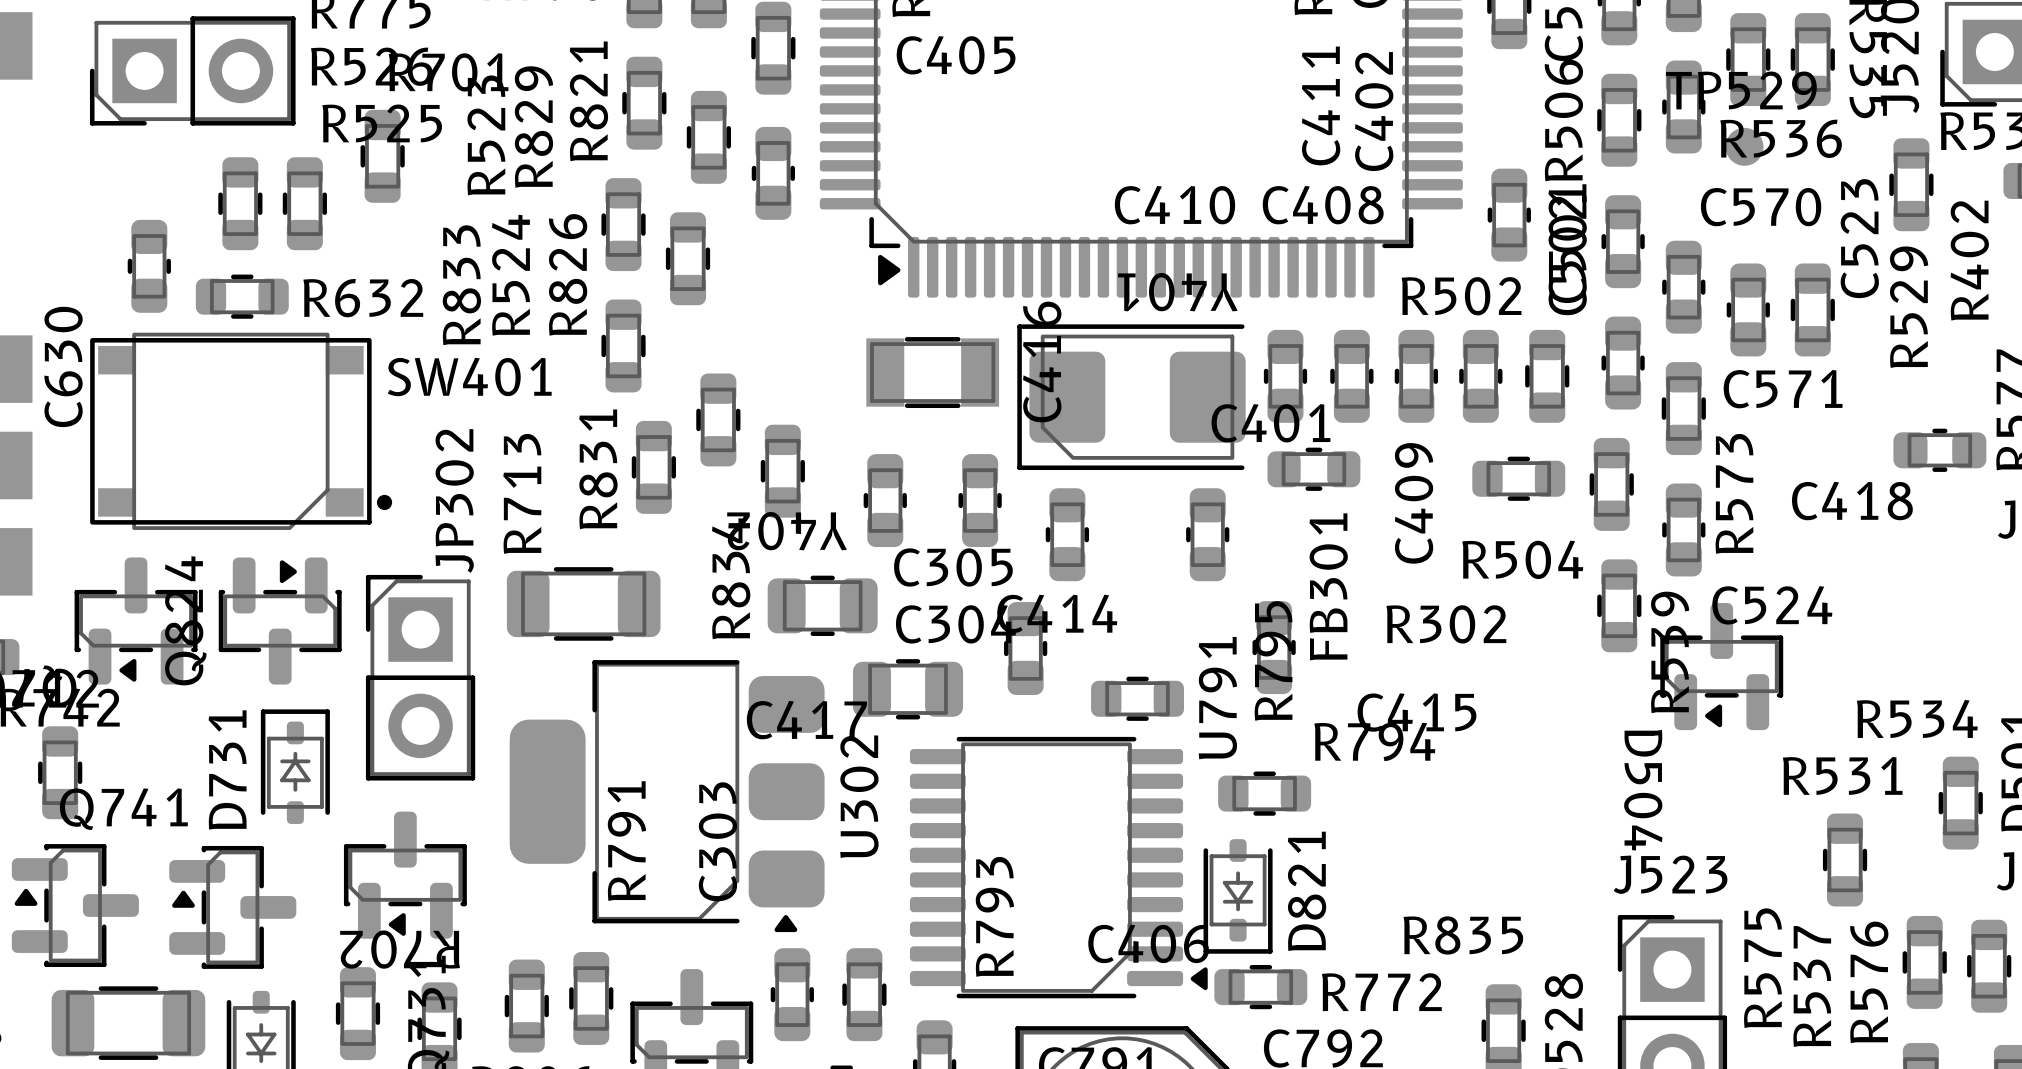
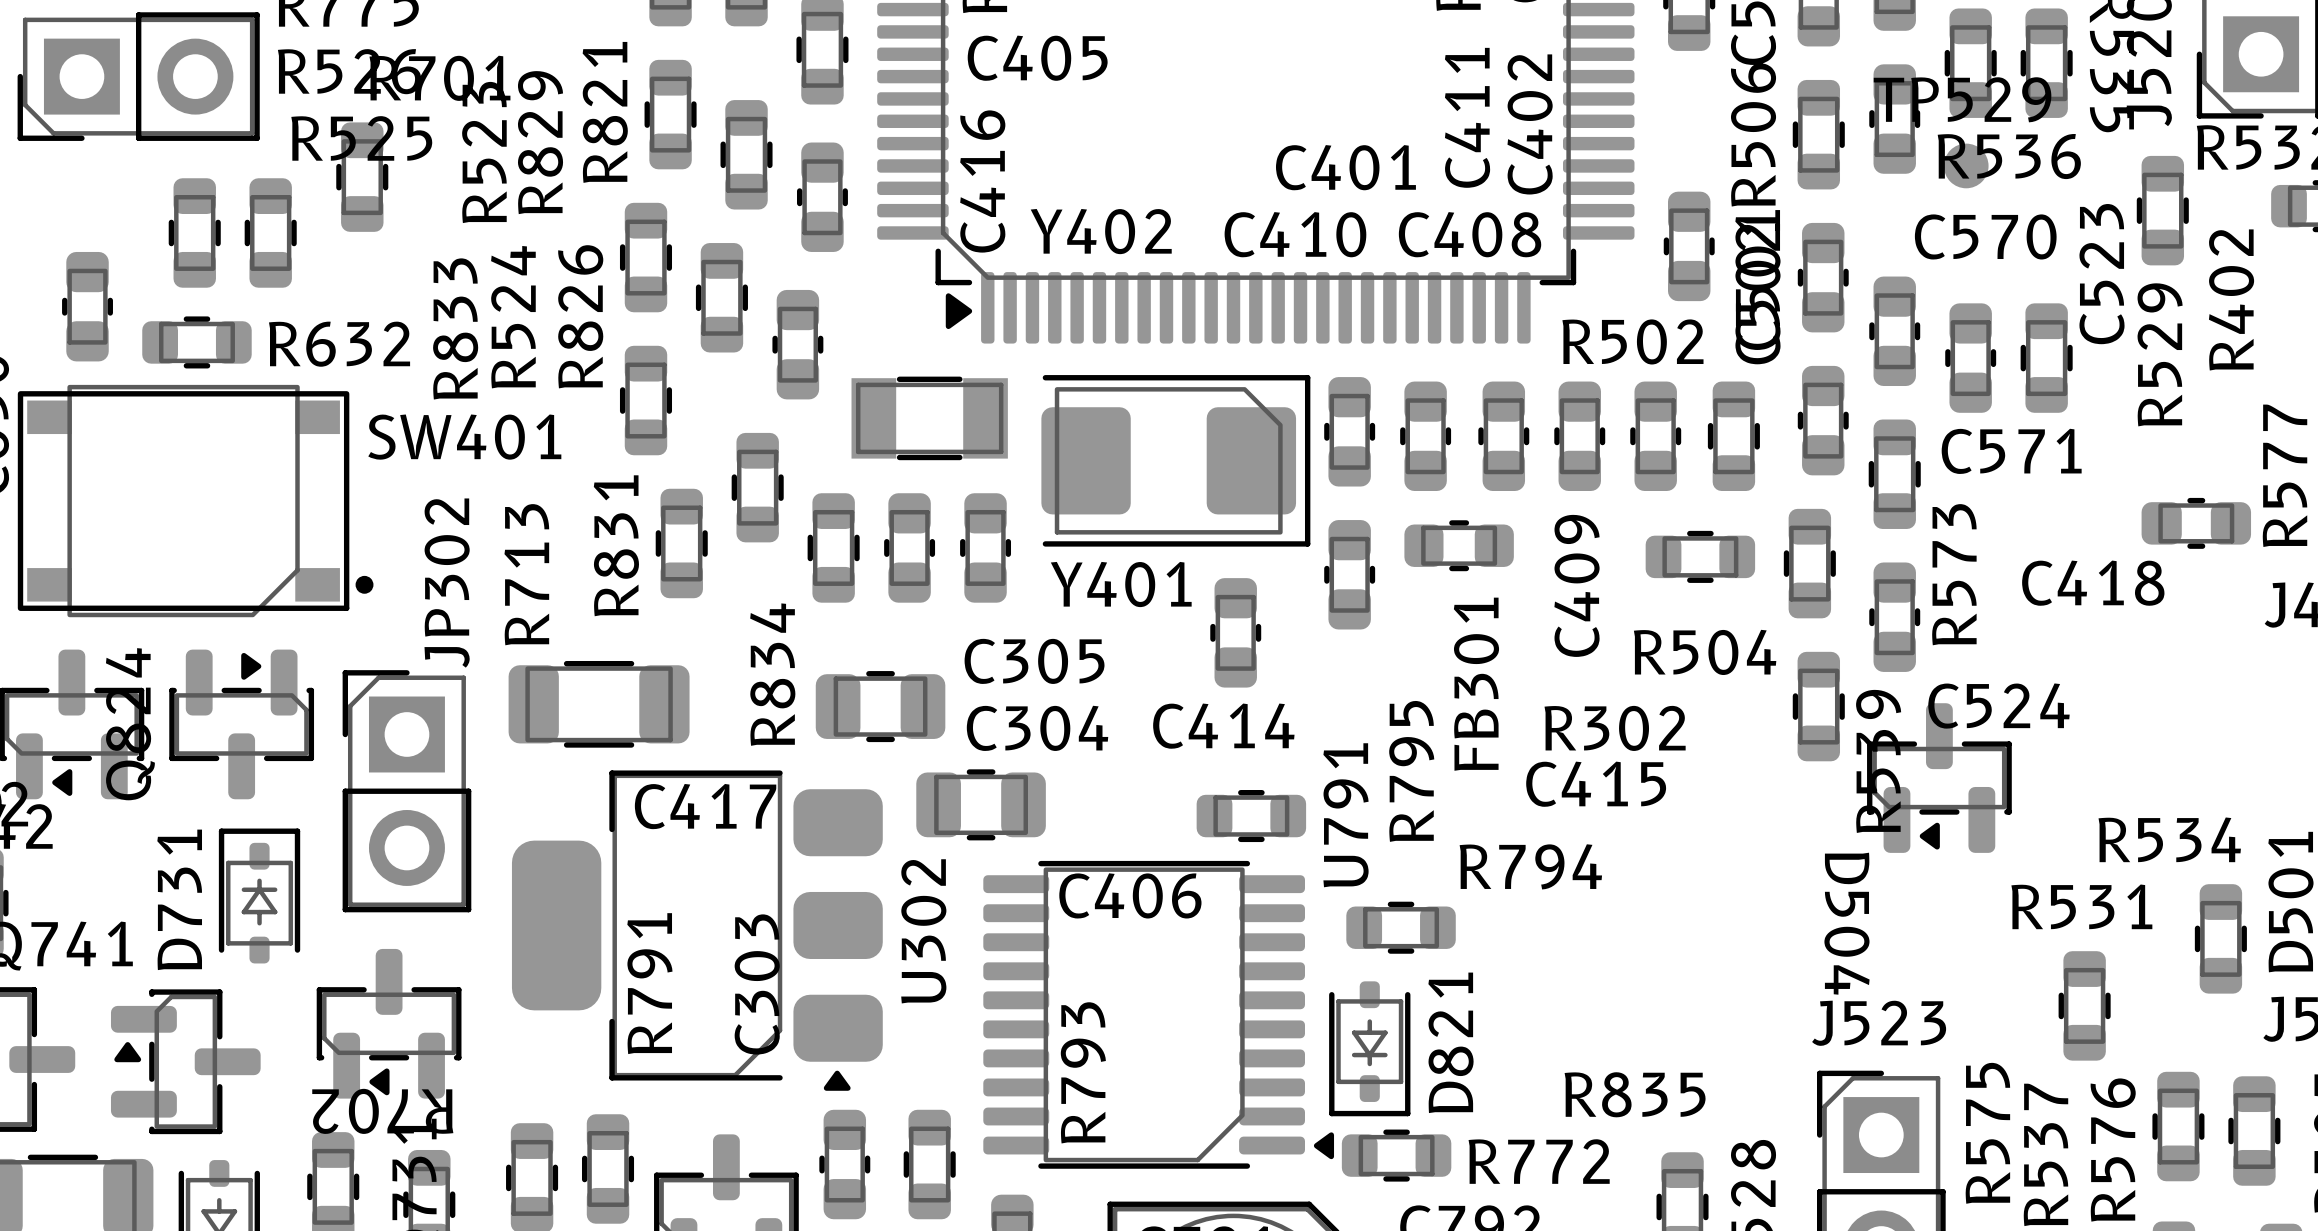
Y402 position: (932, 372) -> (929, 418)
Y401 rotation: 0° (1131, 397) -> 180° (1175, 460)
C416 position: (885, 500) -> (797, 344)
C417 position: (980, 500) -> (909, 547)
Y402 name rotation: 0° (787, 531) -> 180° (1101, 231)
Y402 name position: Y402 (787, 531) -> Y402 (1101, 231)
C414 position: (1067, 534) -> (1235, 632)
C415 position: (1207, 534) -> (1349, 574)
C401 position: (1274, 647) -> (1349, 431)
C406 position: (1025, 648) -> (985, 547)

